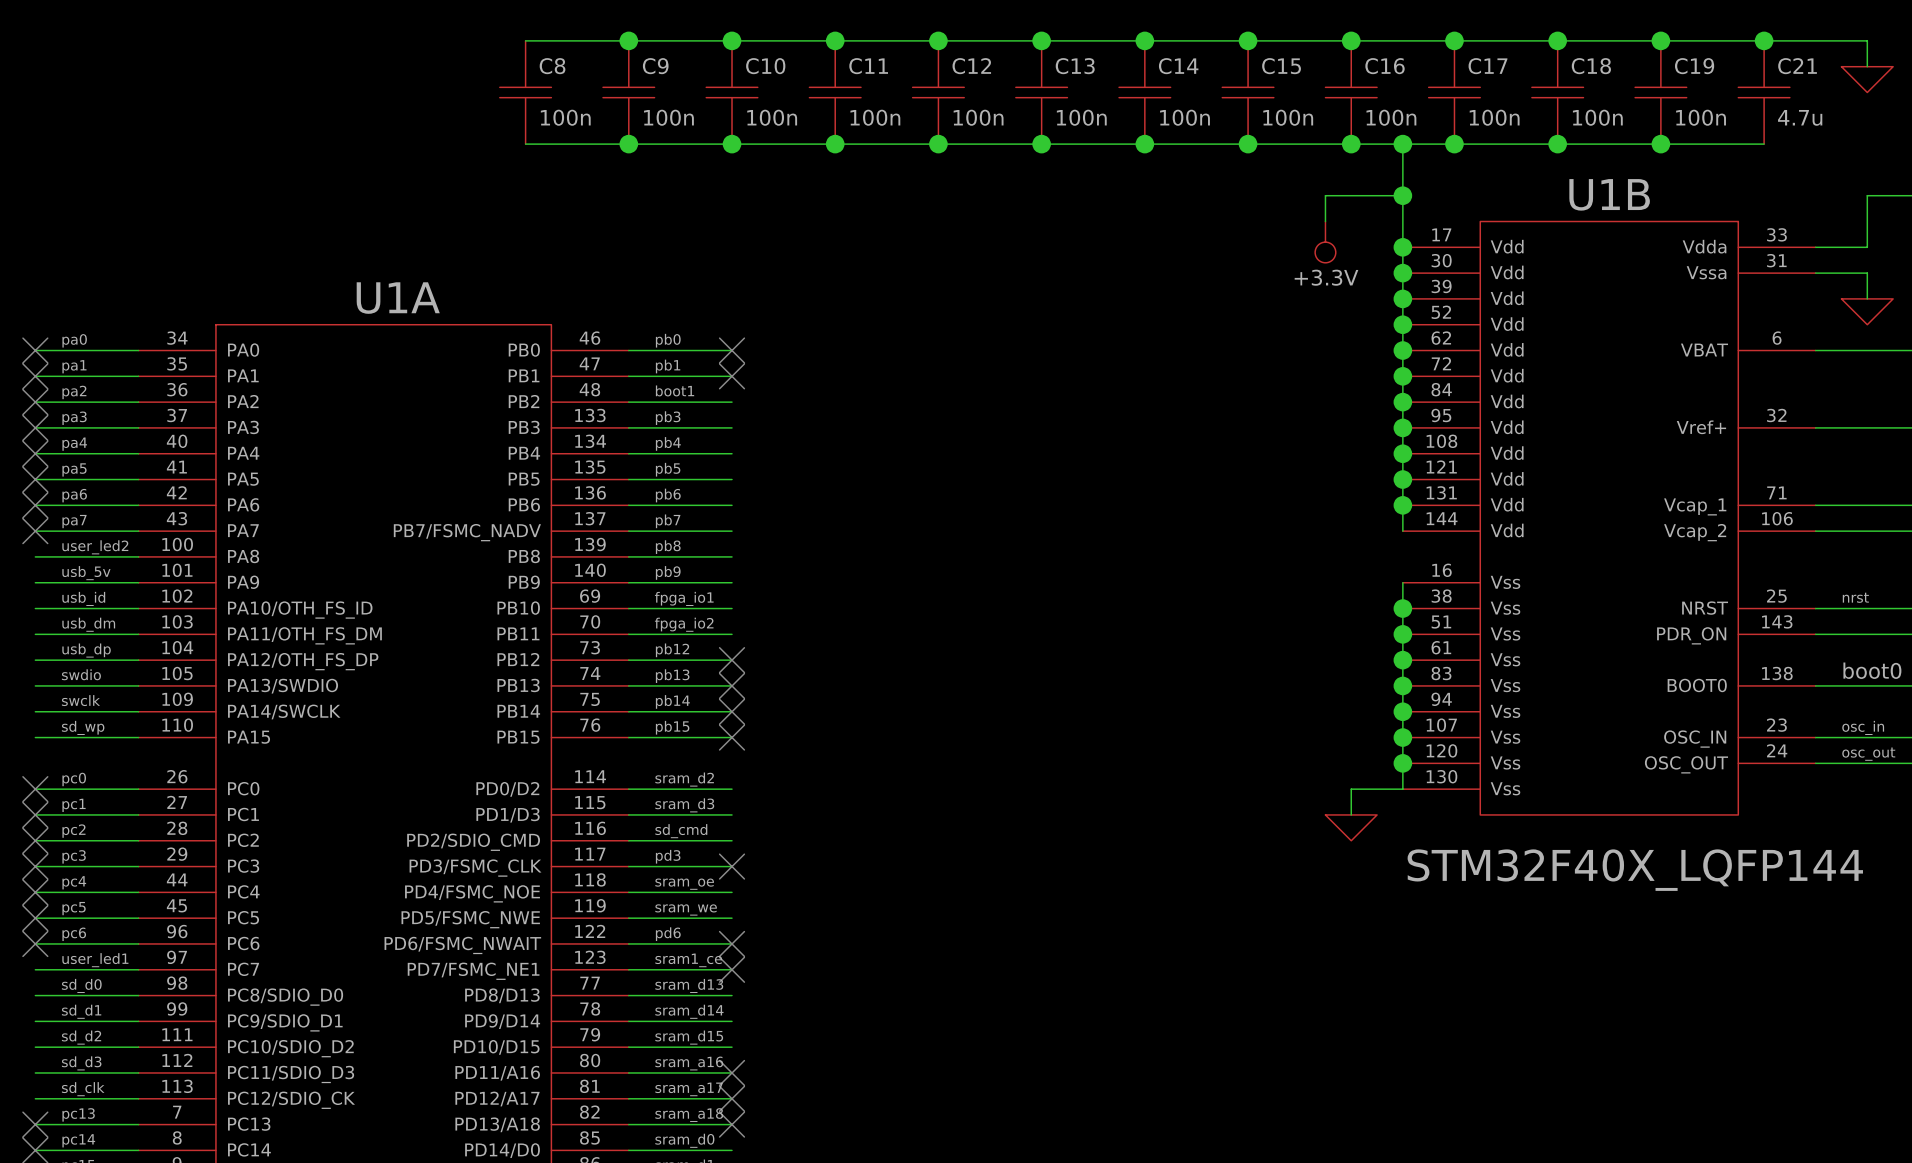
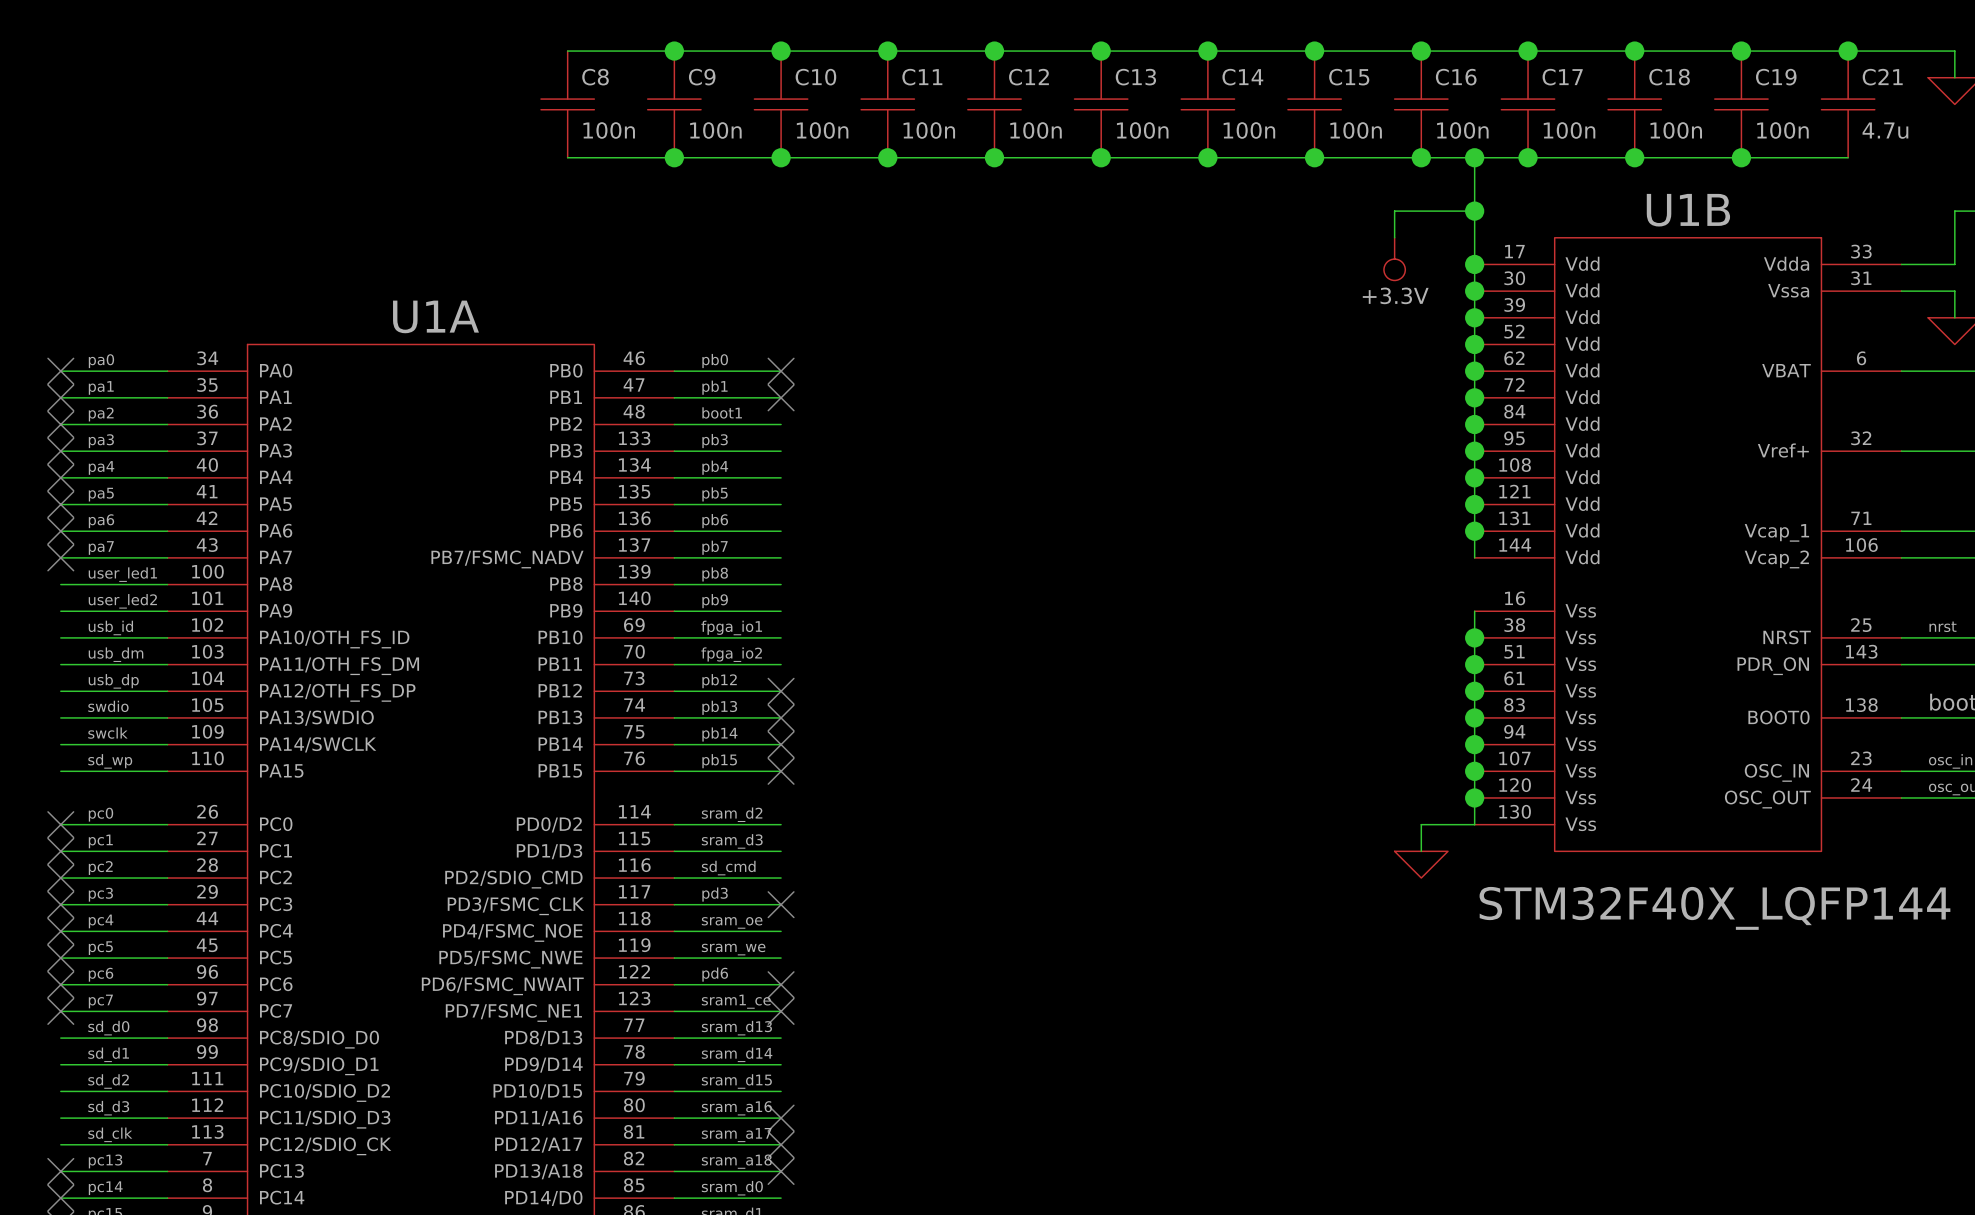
label: user_led2 (95, 547) -> user_led1 (122, 574)
label: usb_5v (86, 573) -> user_led2 (122, 601)
label: user_led1 (95, 960) -> pc7 (100, 1001)
no-connect mark: none -> (60, 1011)

